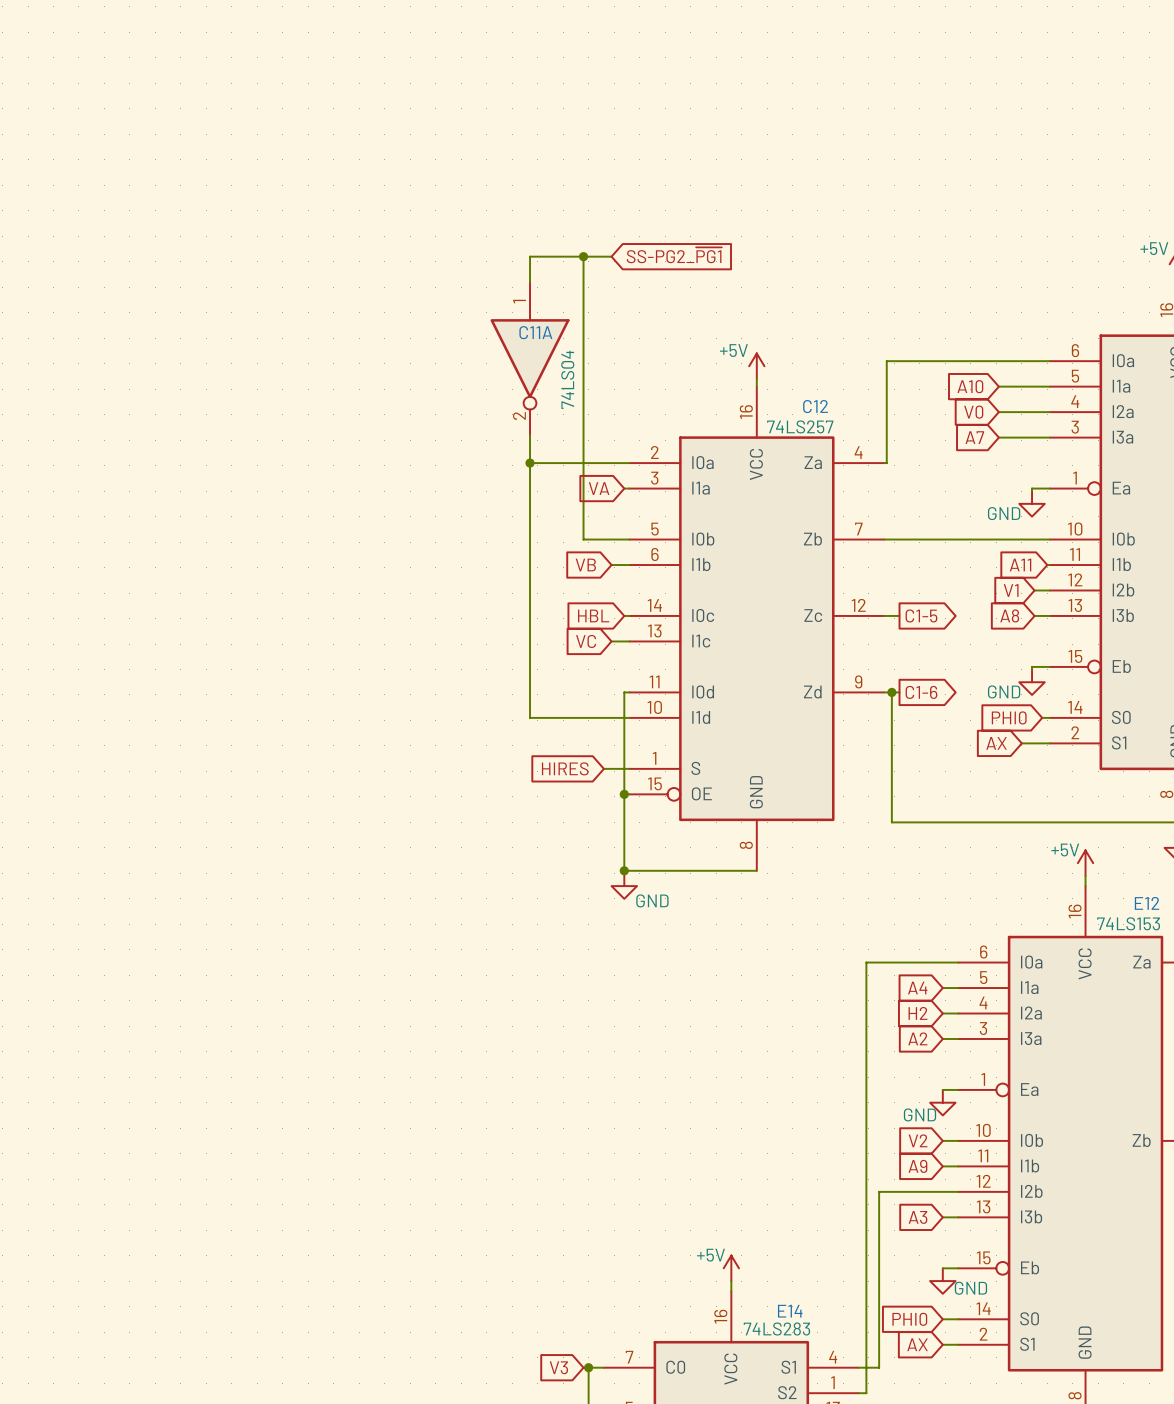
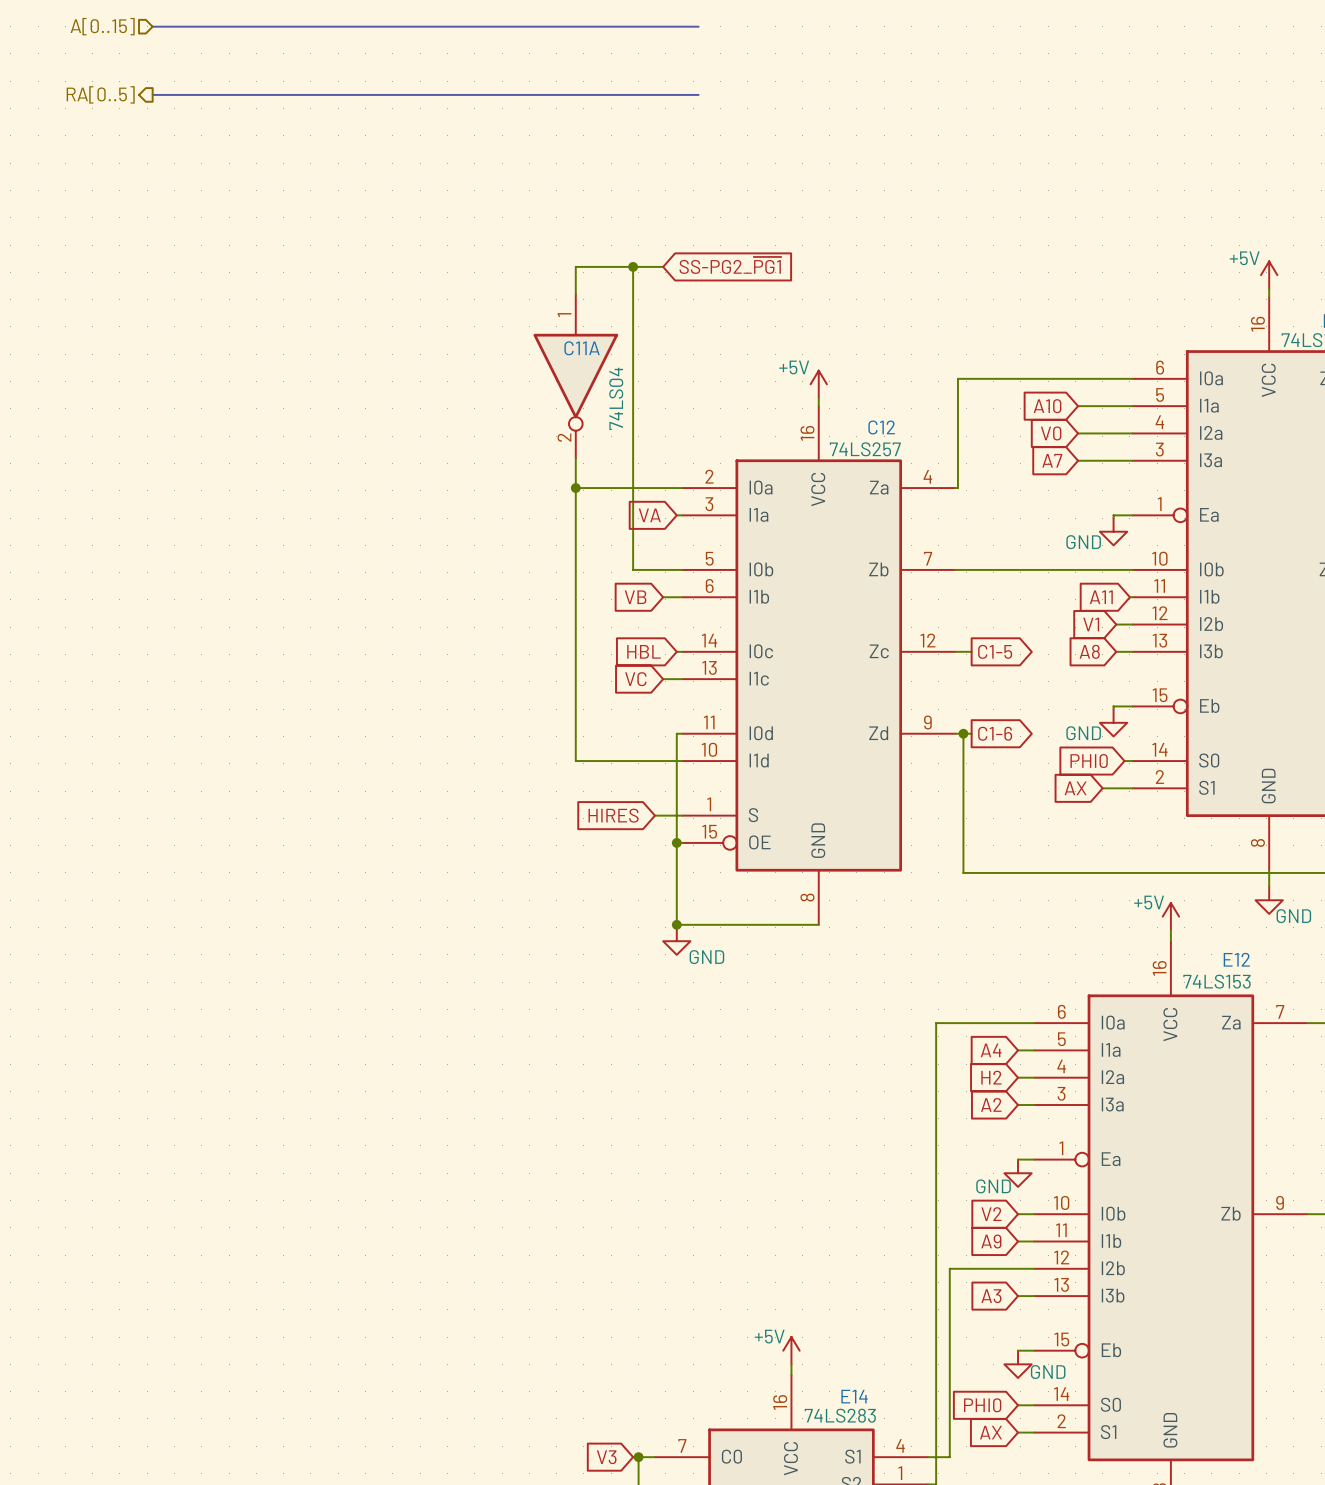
hierarchical label: none -> A[0..15] (102, 26)
bus: none -> (152, 26) (698, 26)
hierarchical label: none -> RA[0..5] (100, 94)
bus: none -> (152, 94) (698, 94)

